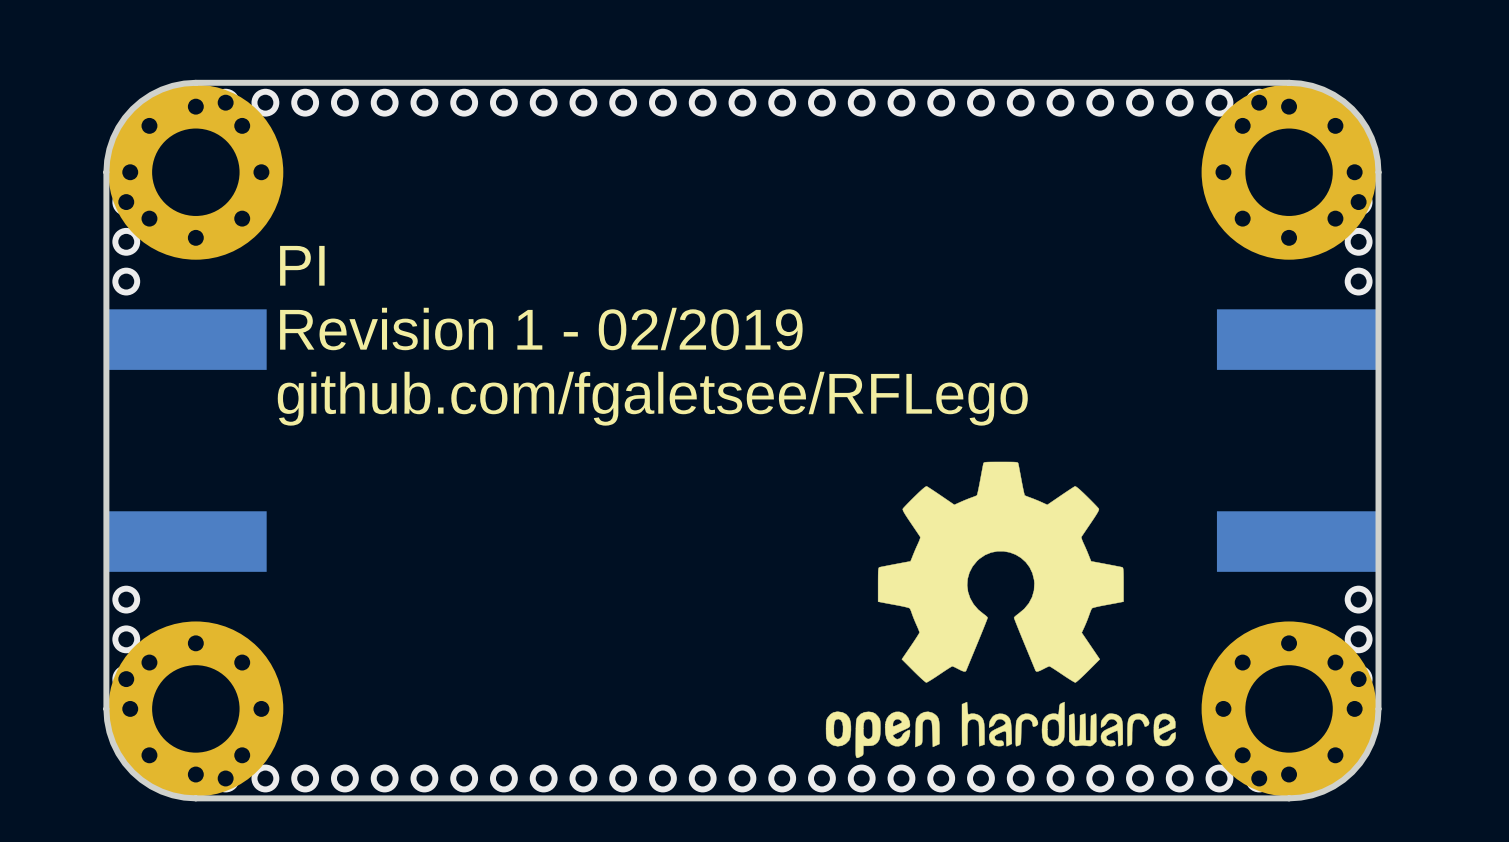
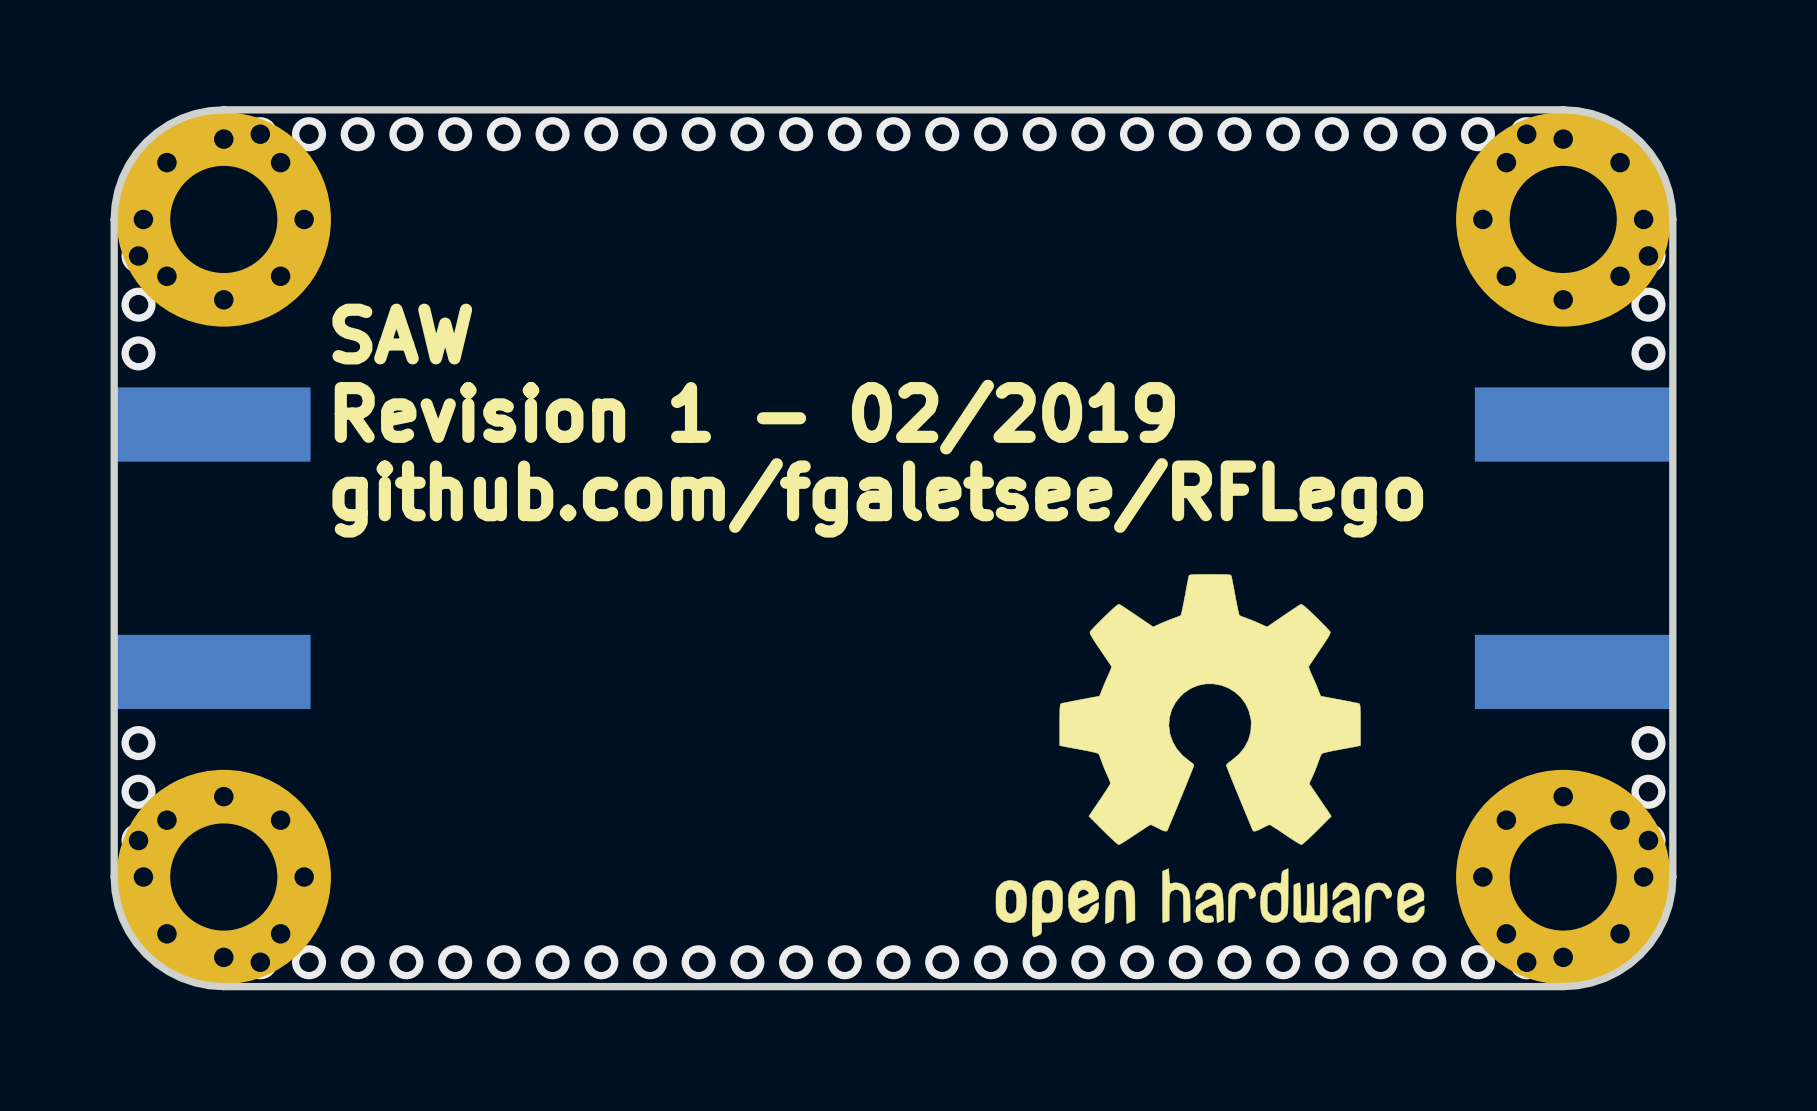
text: PI (302, 265) -> SAW (402, 334)

